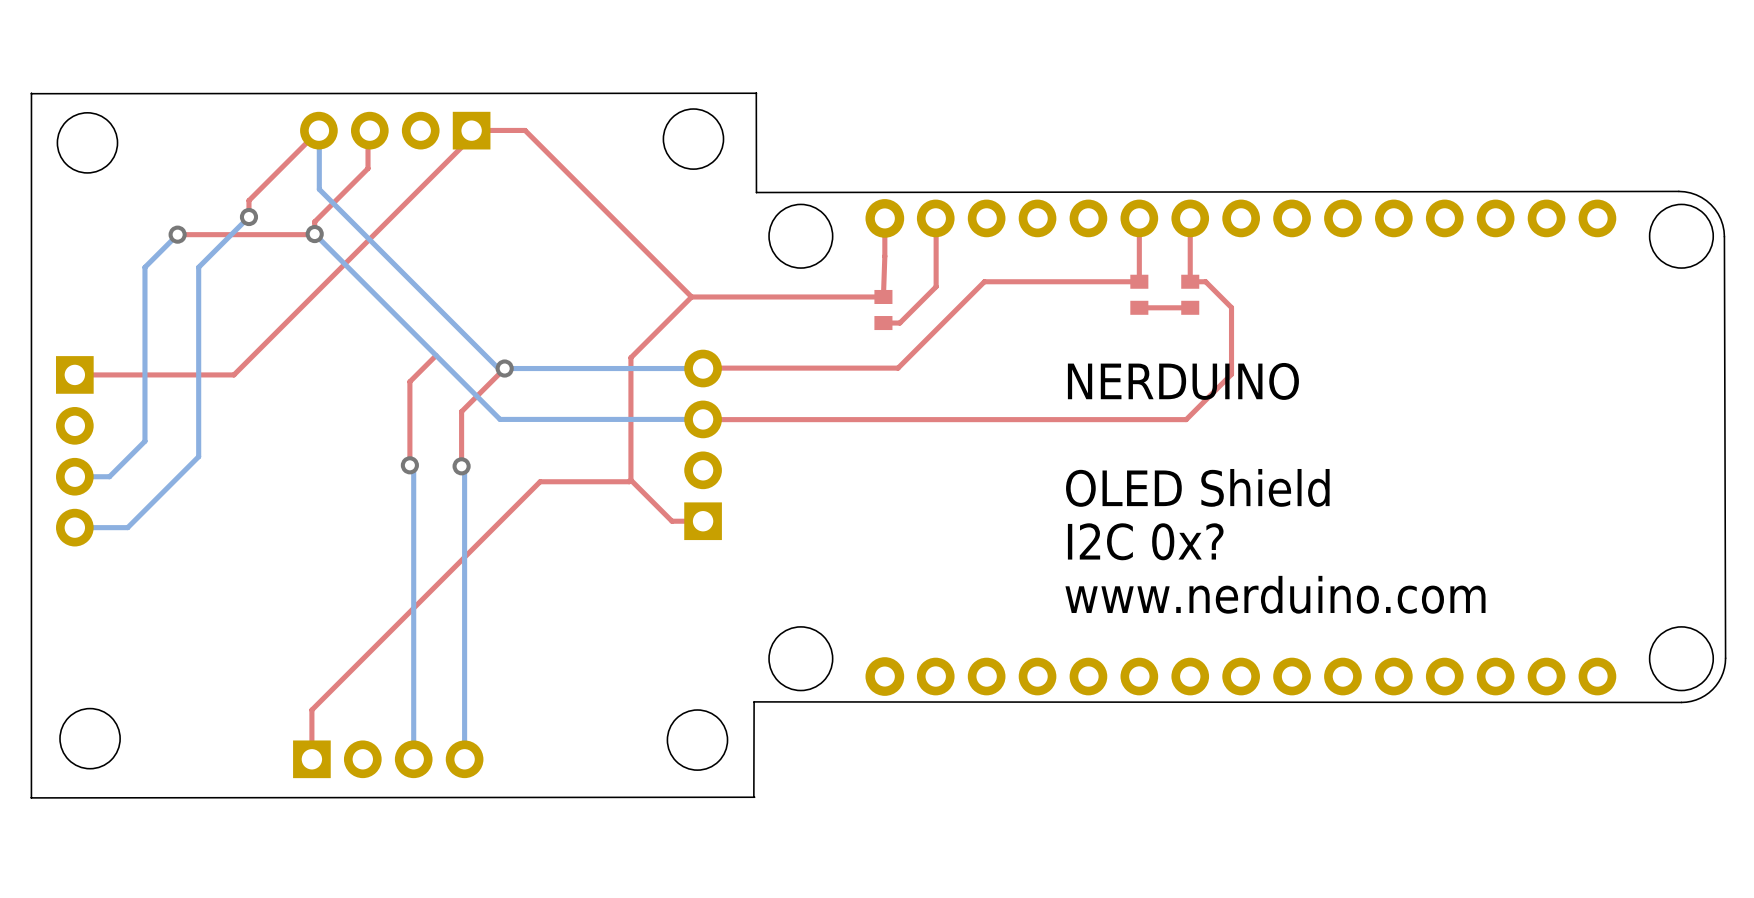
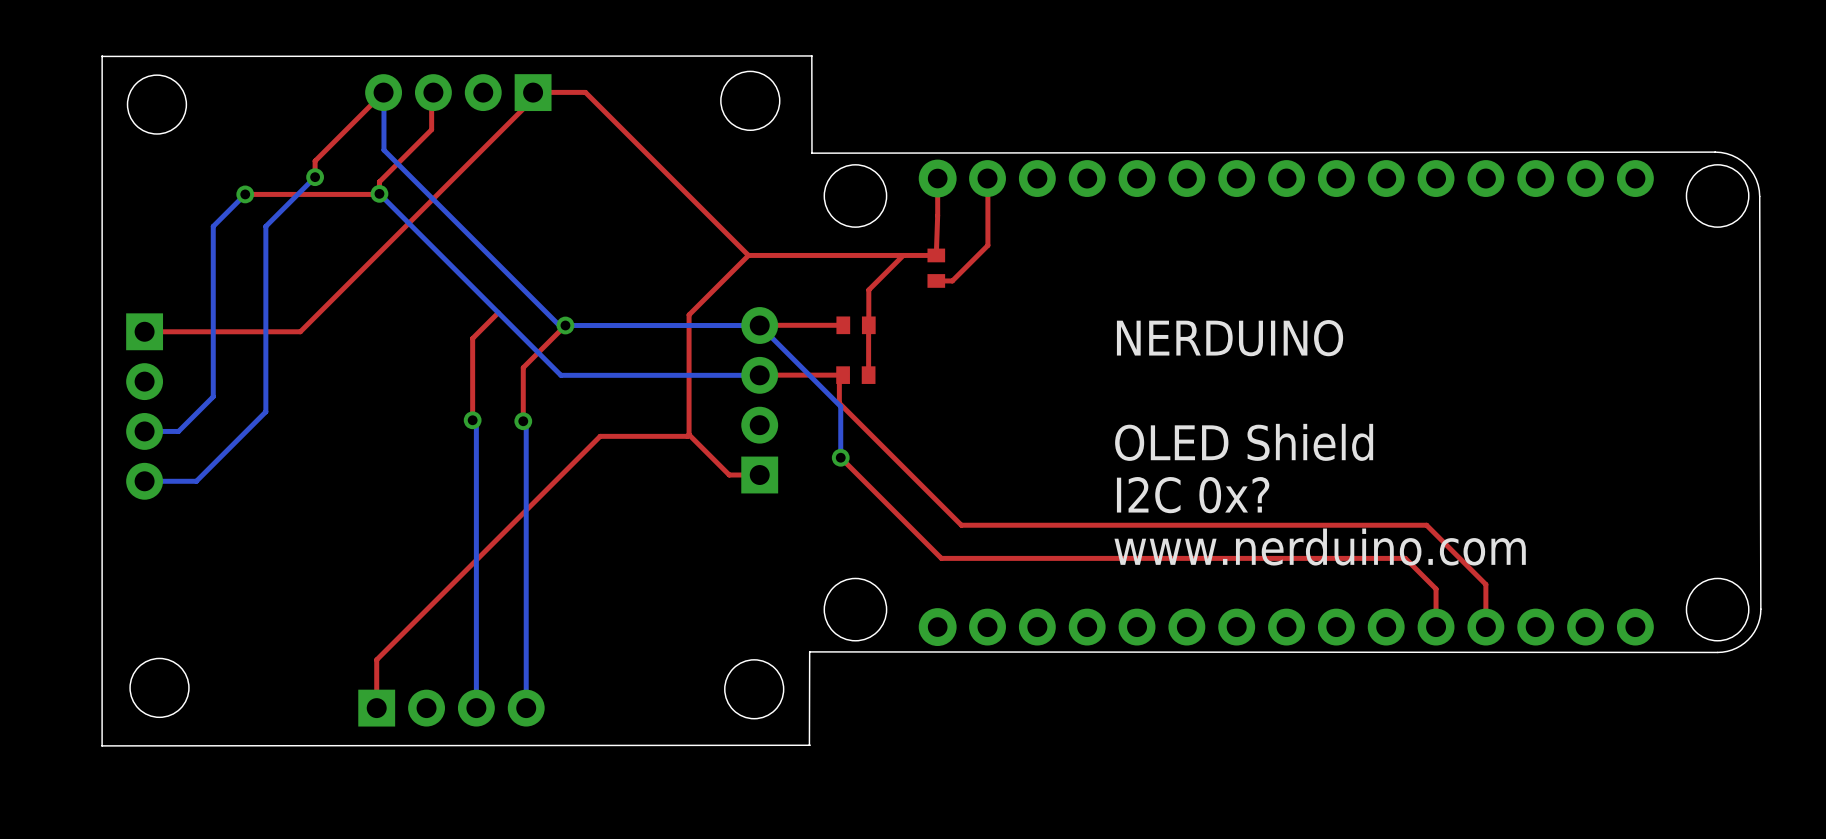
top track: (1139, 218) (1139, 281) (984, 281) (898, 368) (703, 368) -> (843, 325) (759, 325)
top track: (1190, 218) (1190, 281) (1205, 281) (1231, 307) (1231, 374) (1186, 419) (703, 419) -> (1485, 627) (1485, 584) (1426, 525) (961, 525) (839, 403) (839, 378) (843, 375) (759, 375)
part: (1139, 294) -> none
part: (1190, 294) -> none
top track: none -> (903, 255) (868, 289) (868, 325)
top track: (1190, 307) (1139, 307) -> none
bottom track: none -> (759, 325) (840, 406) (840, 457)
part: none -> (856, 325)
top track: none -> (868, 325) (868, 375)
part: none -> (855, 375)
top track: none -> (840, 457) (941, 558) (1405, 558) (1436, 589) (1436, 627)
via: none -> (840, 457)

